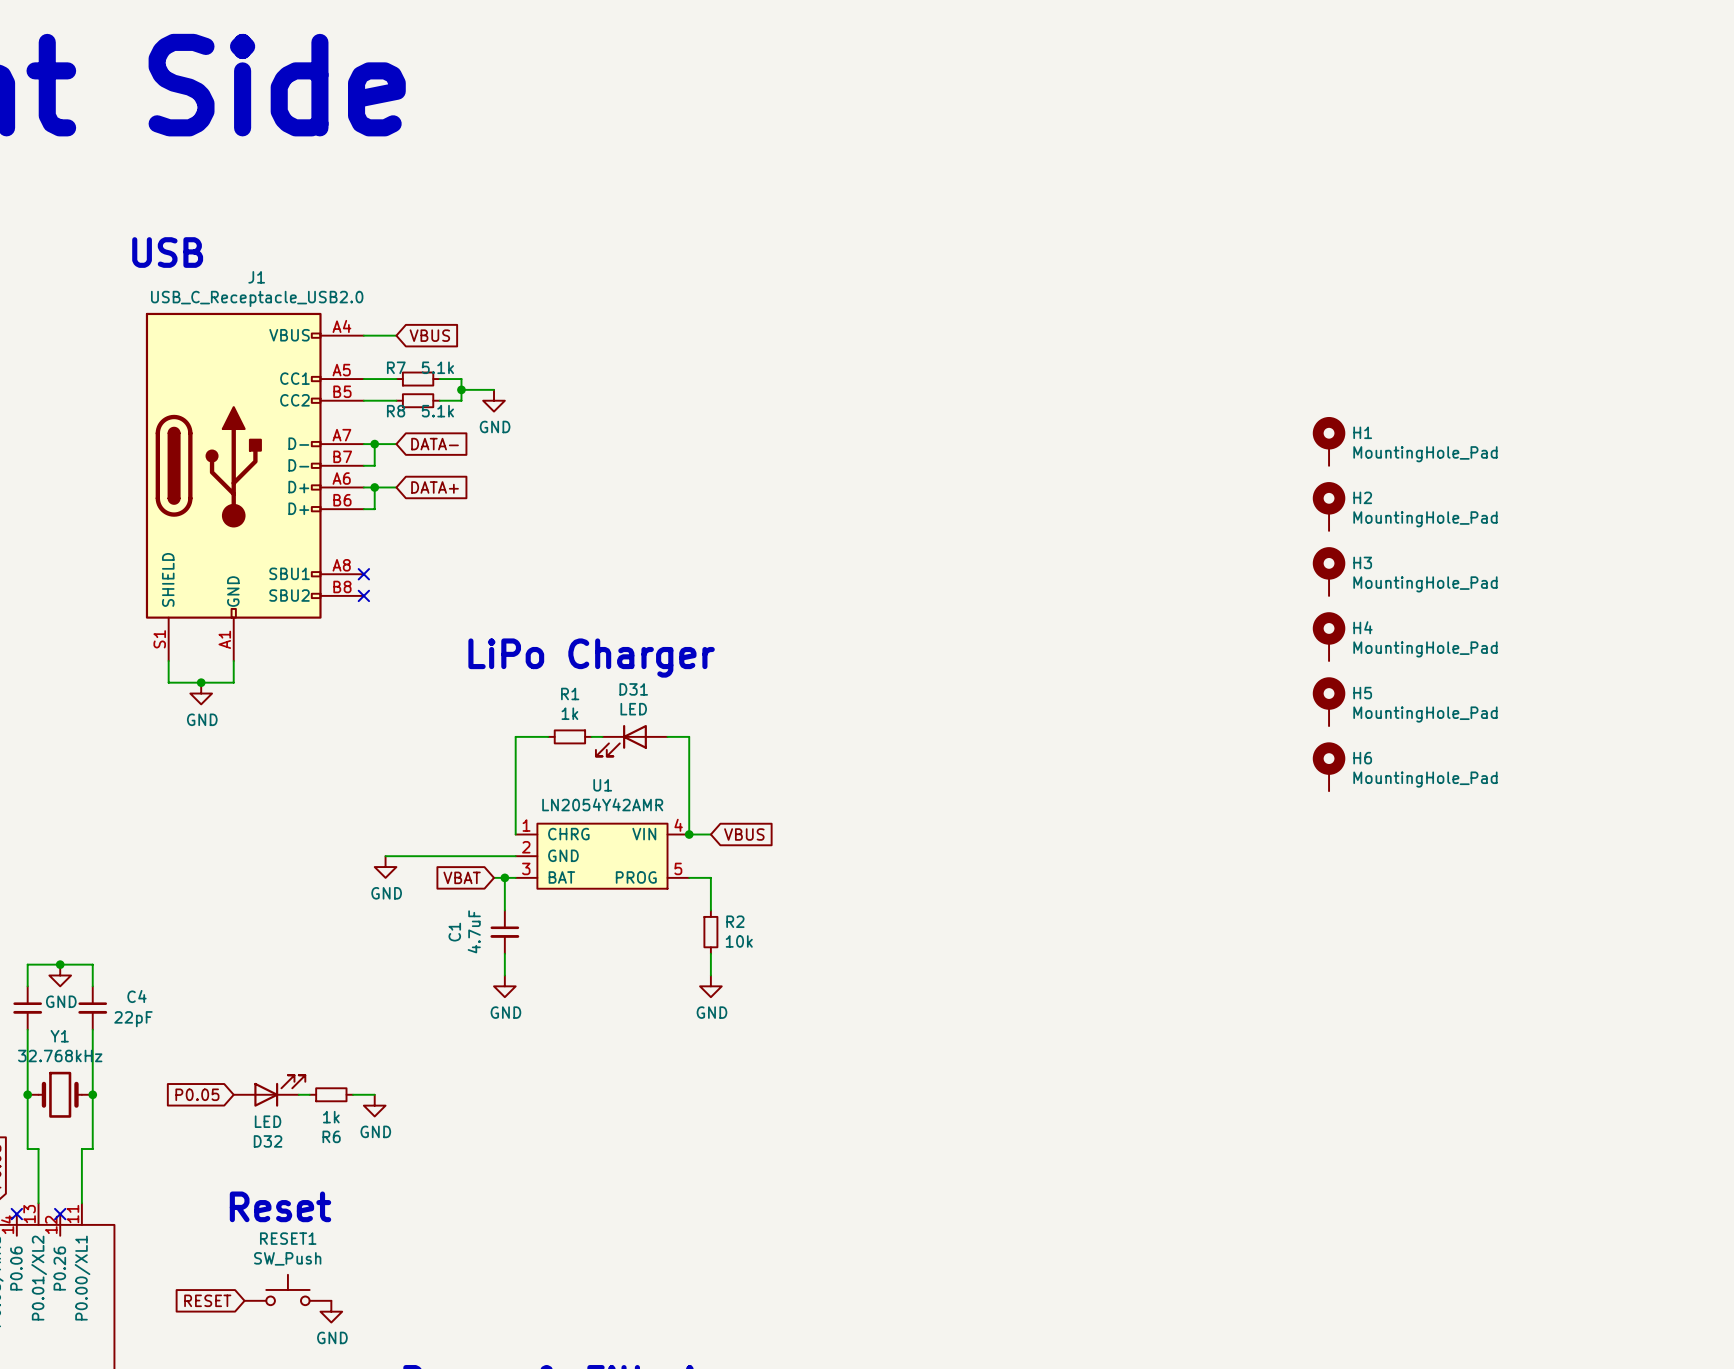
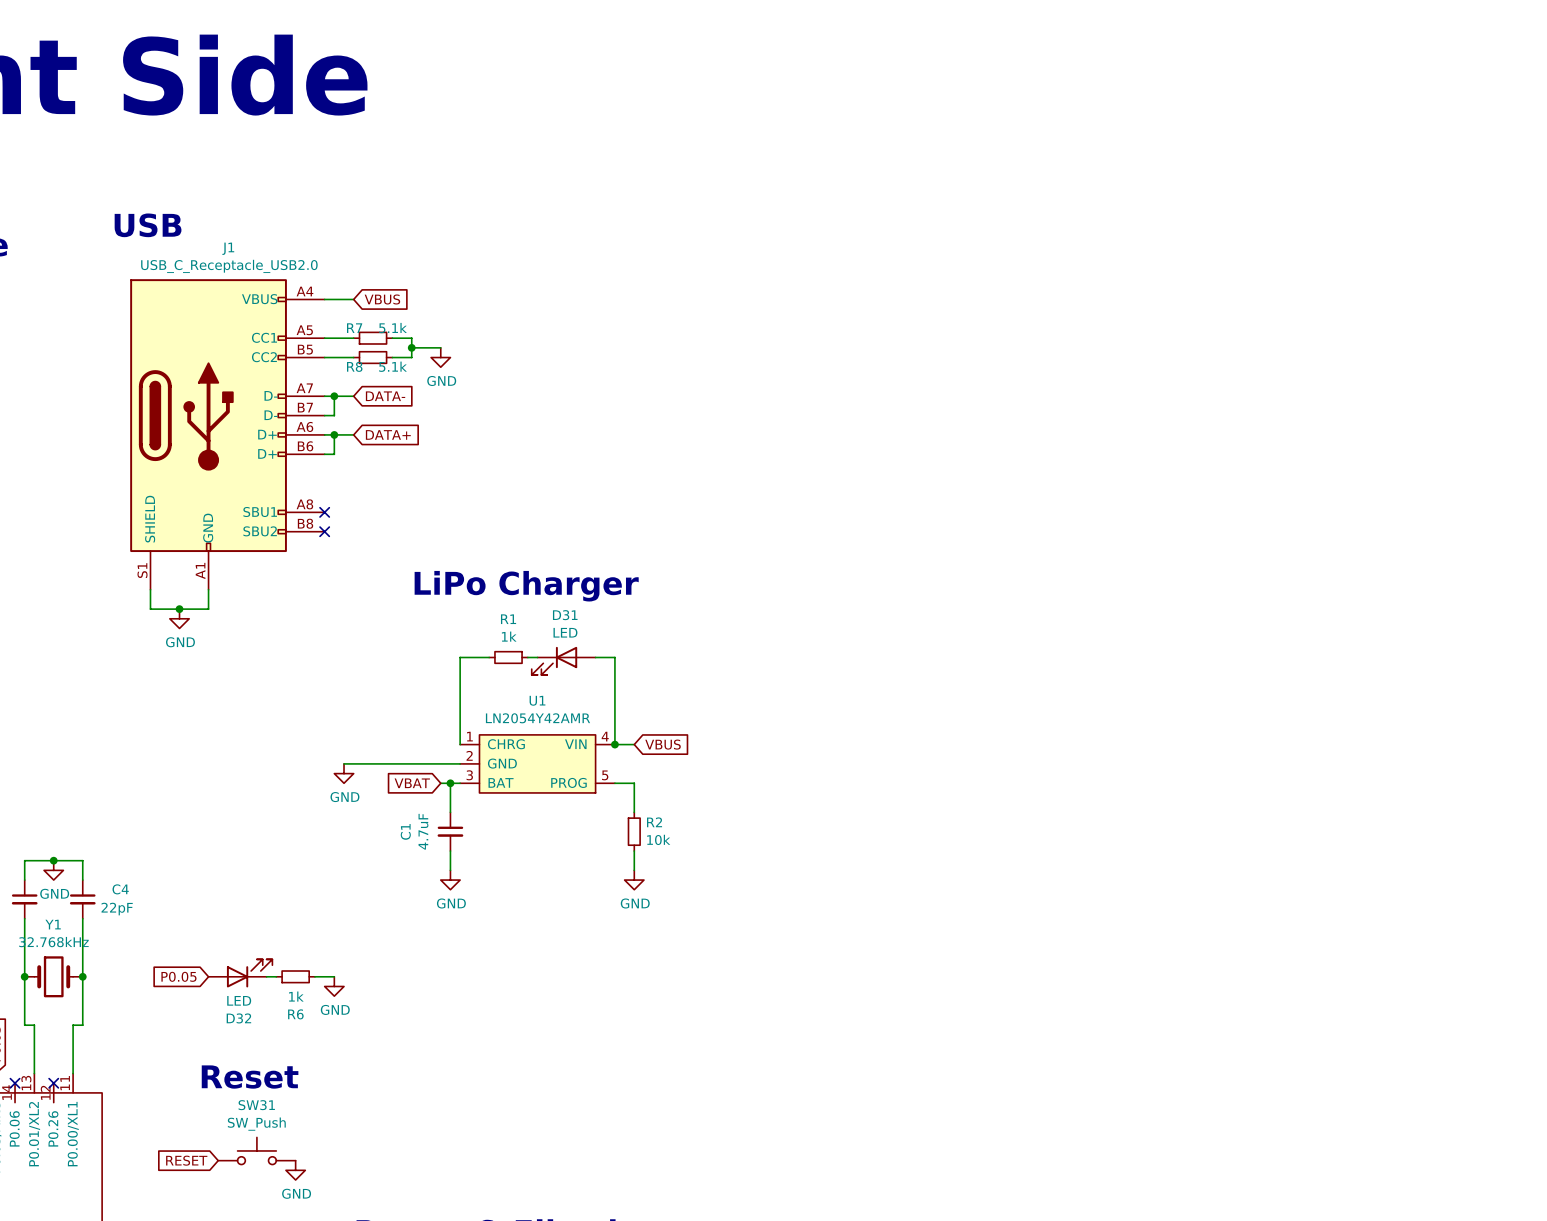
H1: MountingHole_Pad (1329, 441) -> none
H2: MountingHole_Pad (1329, 506) -> none
H3: MountingHole_Pad (1329, 571) -> none
H4: MountingHole_Pad (1329, 636) -> none
H5: MountingHole_Pad (1329, 701) -> none
H6: MountingHole_Pad (1329, 766) -> none
RESET1 name: RESET1 (288, 1238) -> SW31 (256, 1105)

